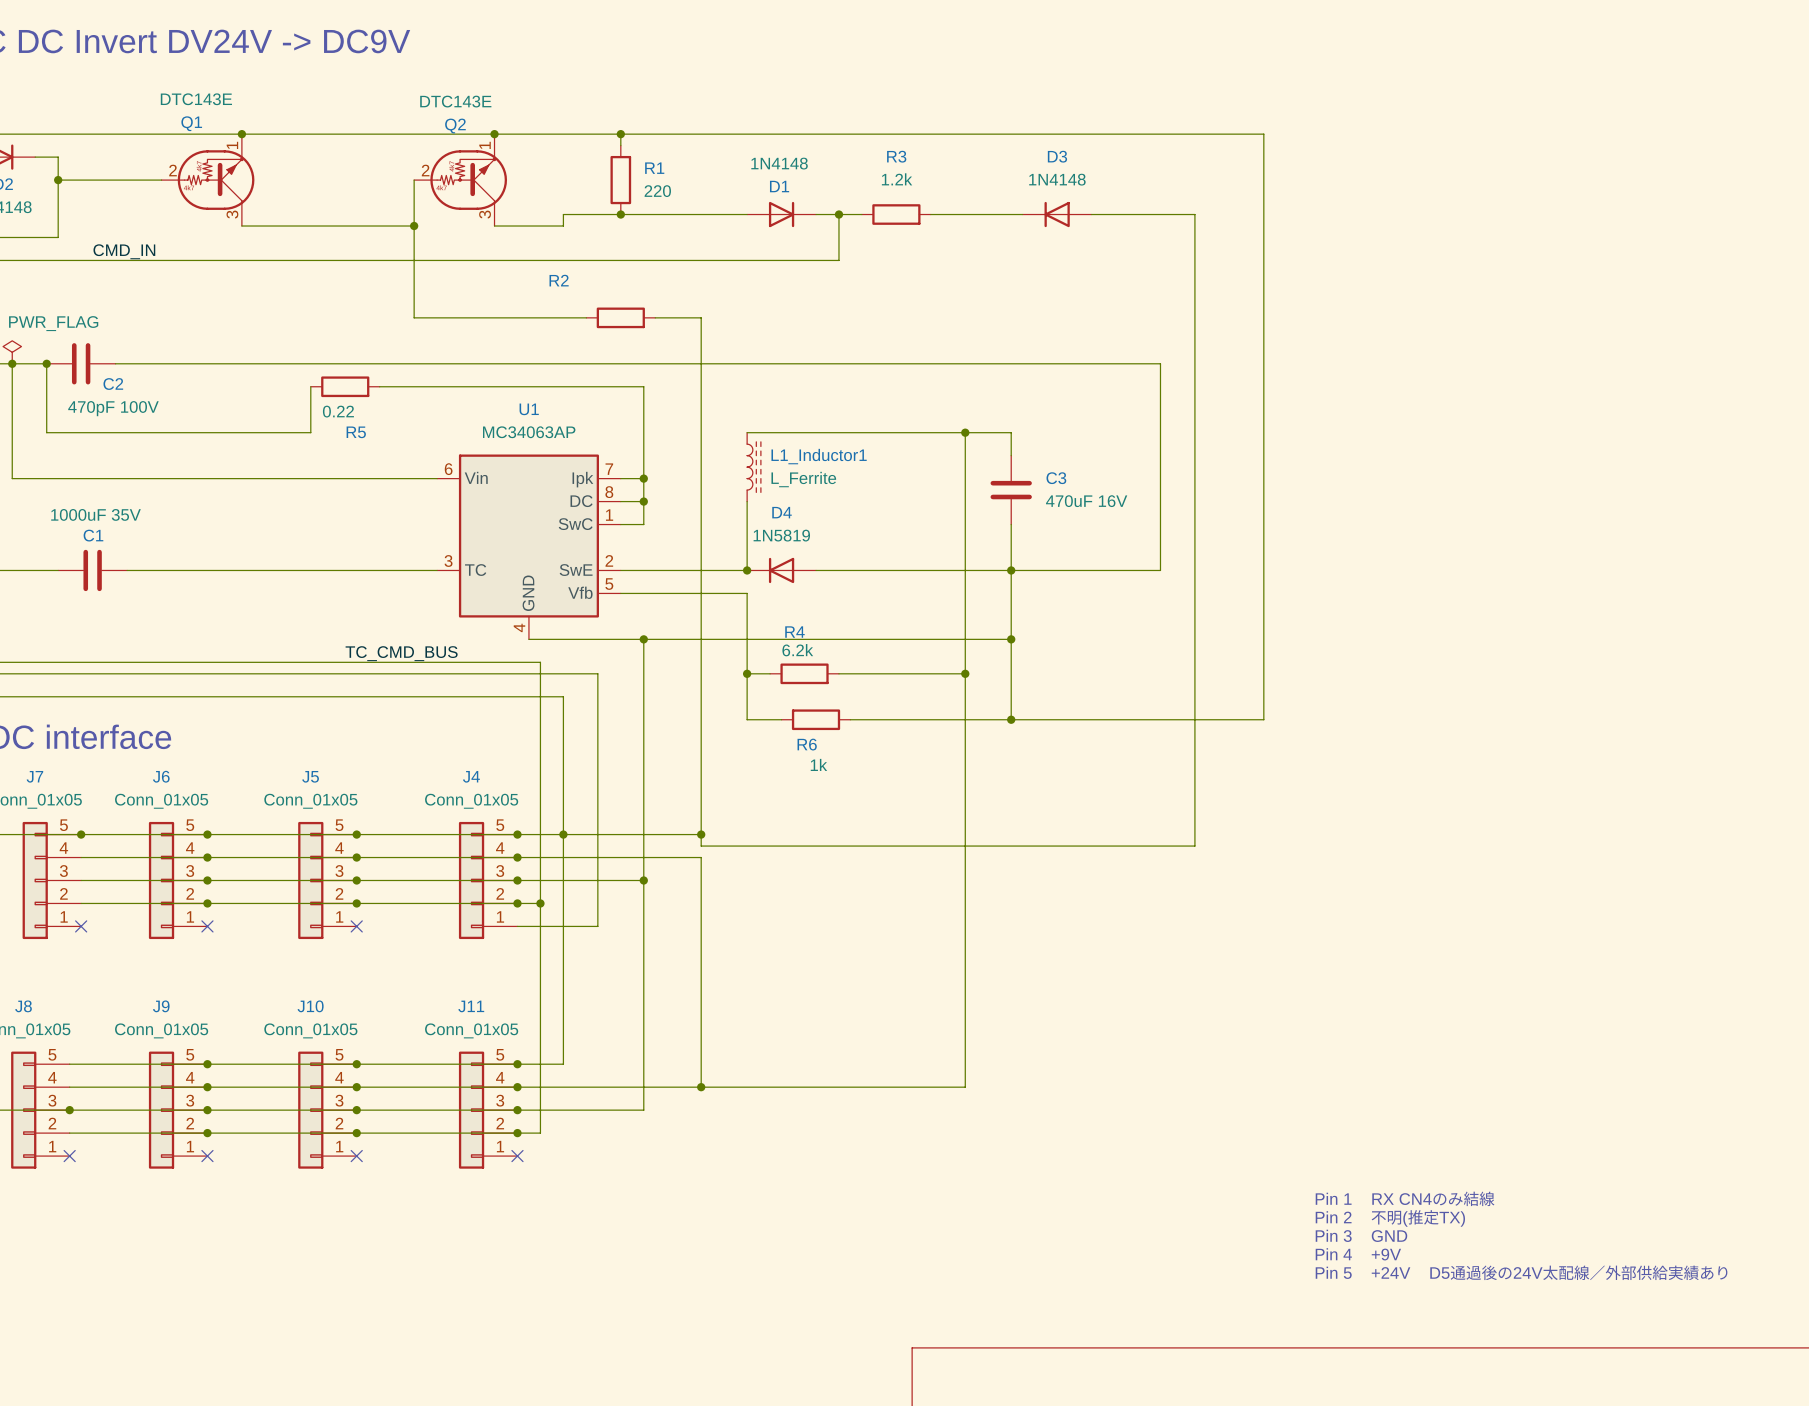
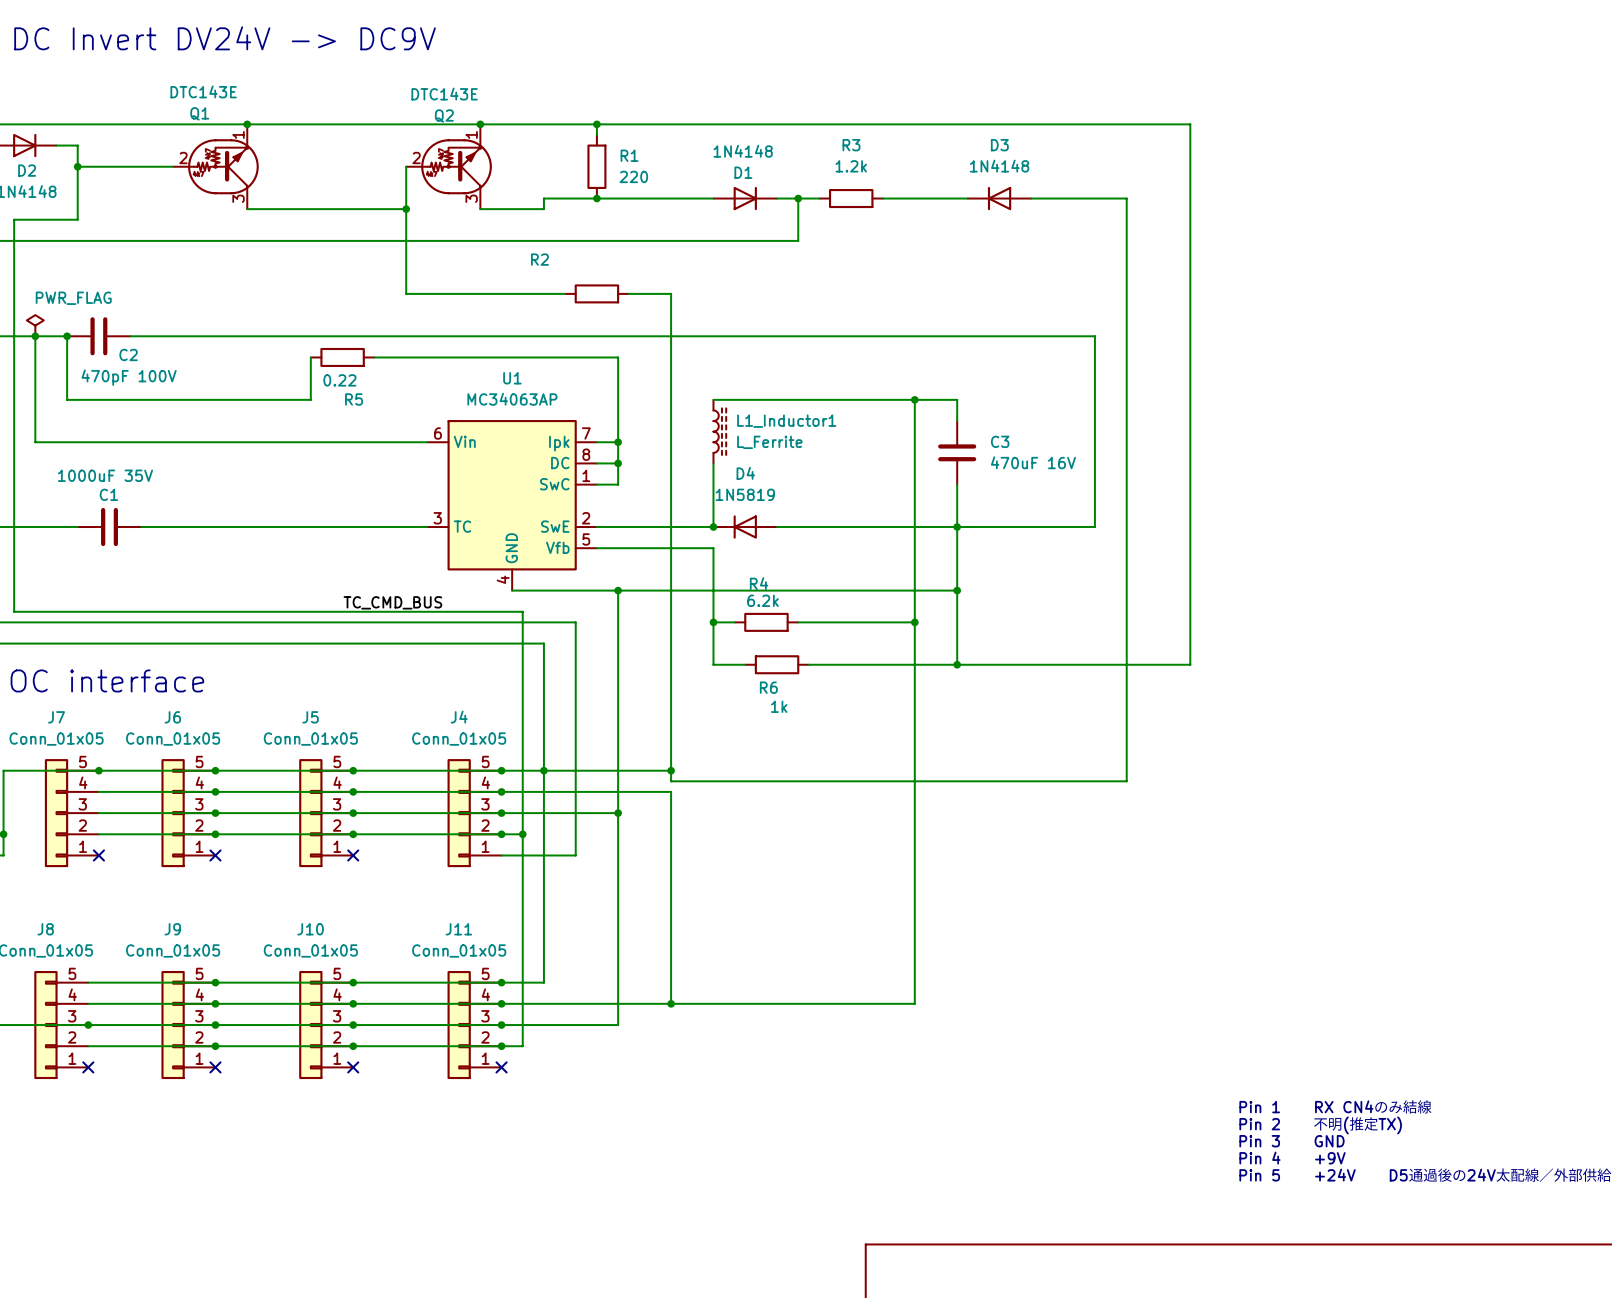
label: CMD_IN (124, 251) -> none

